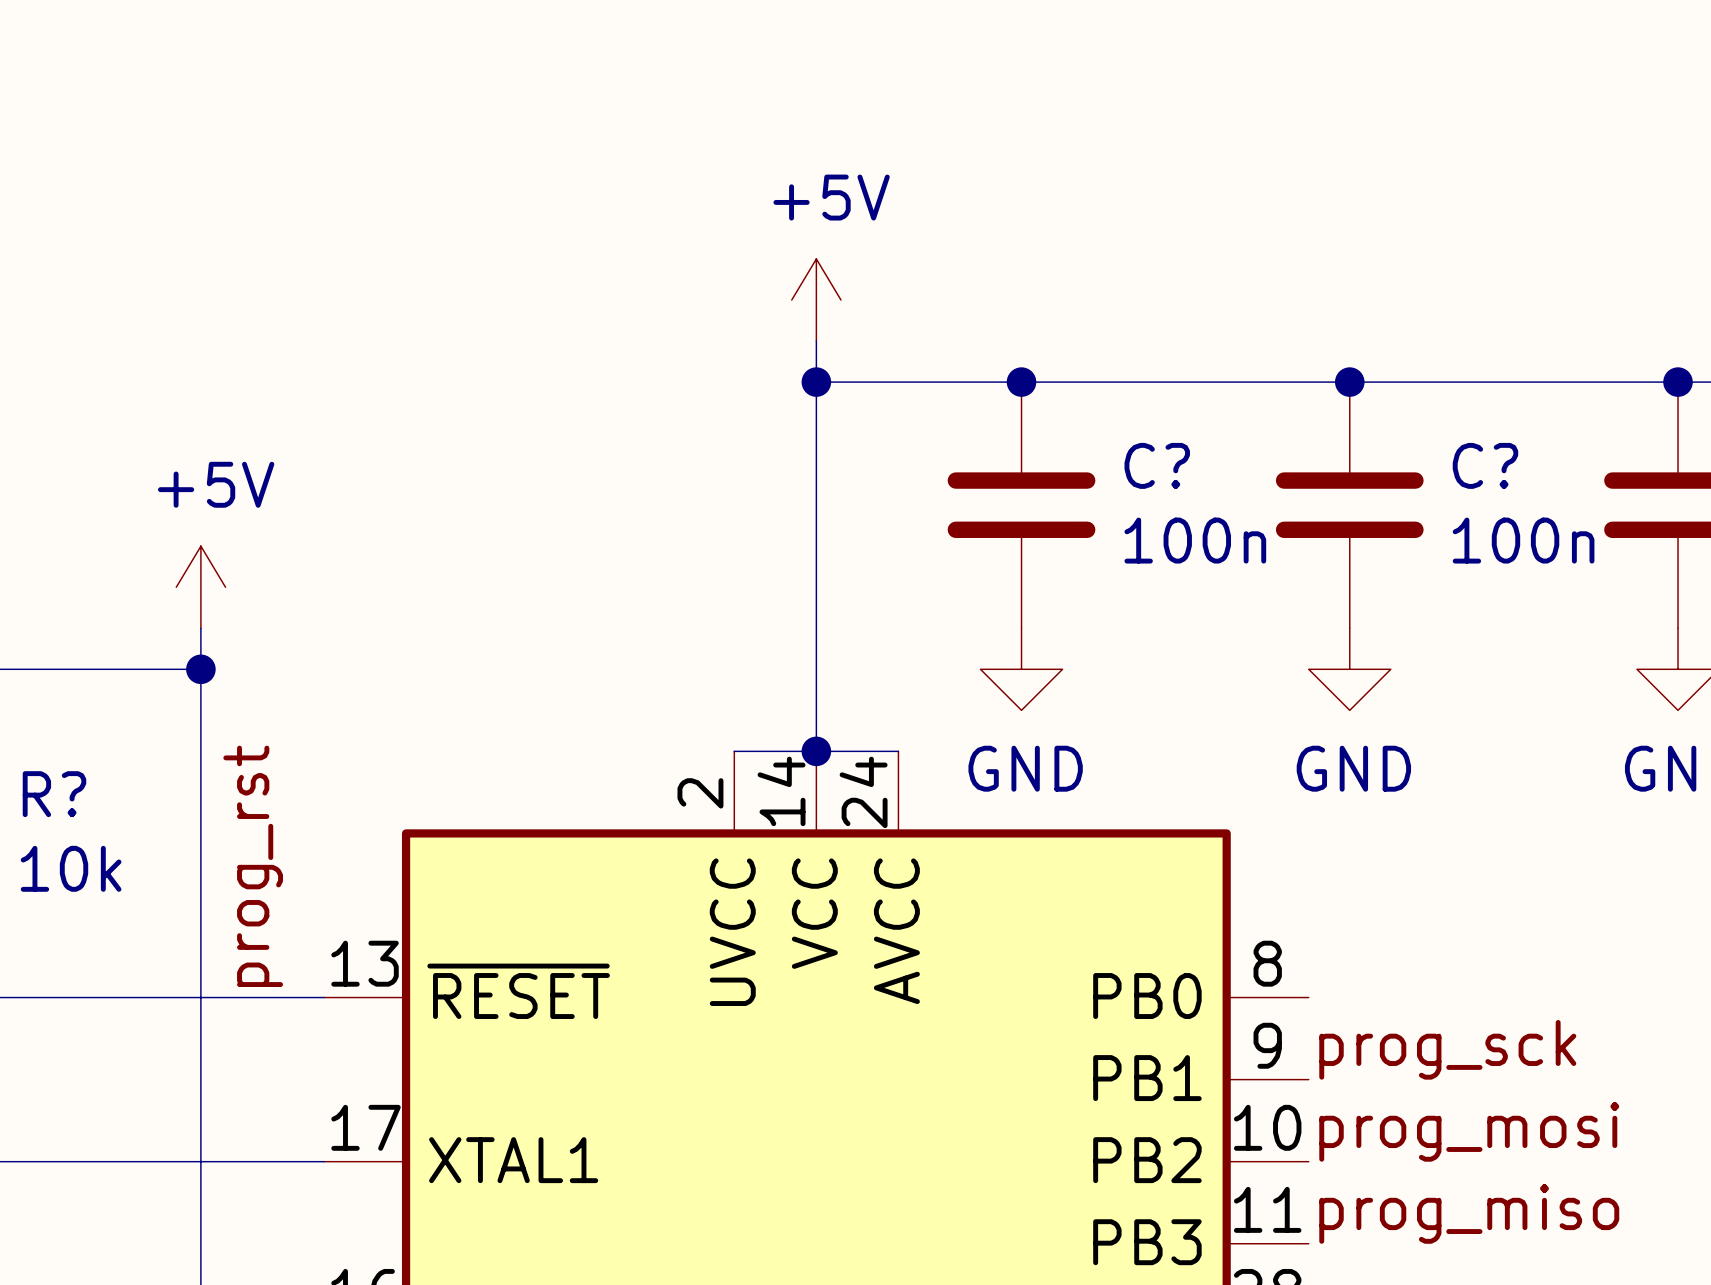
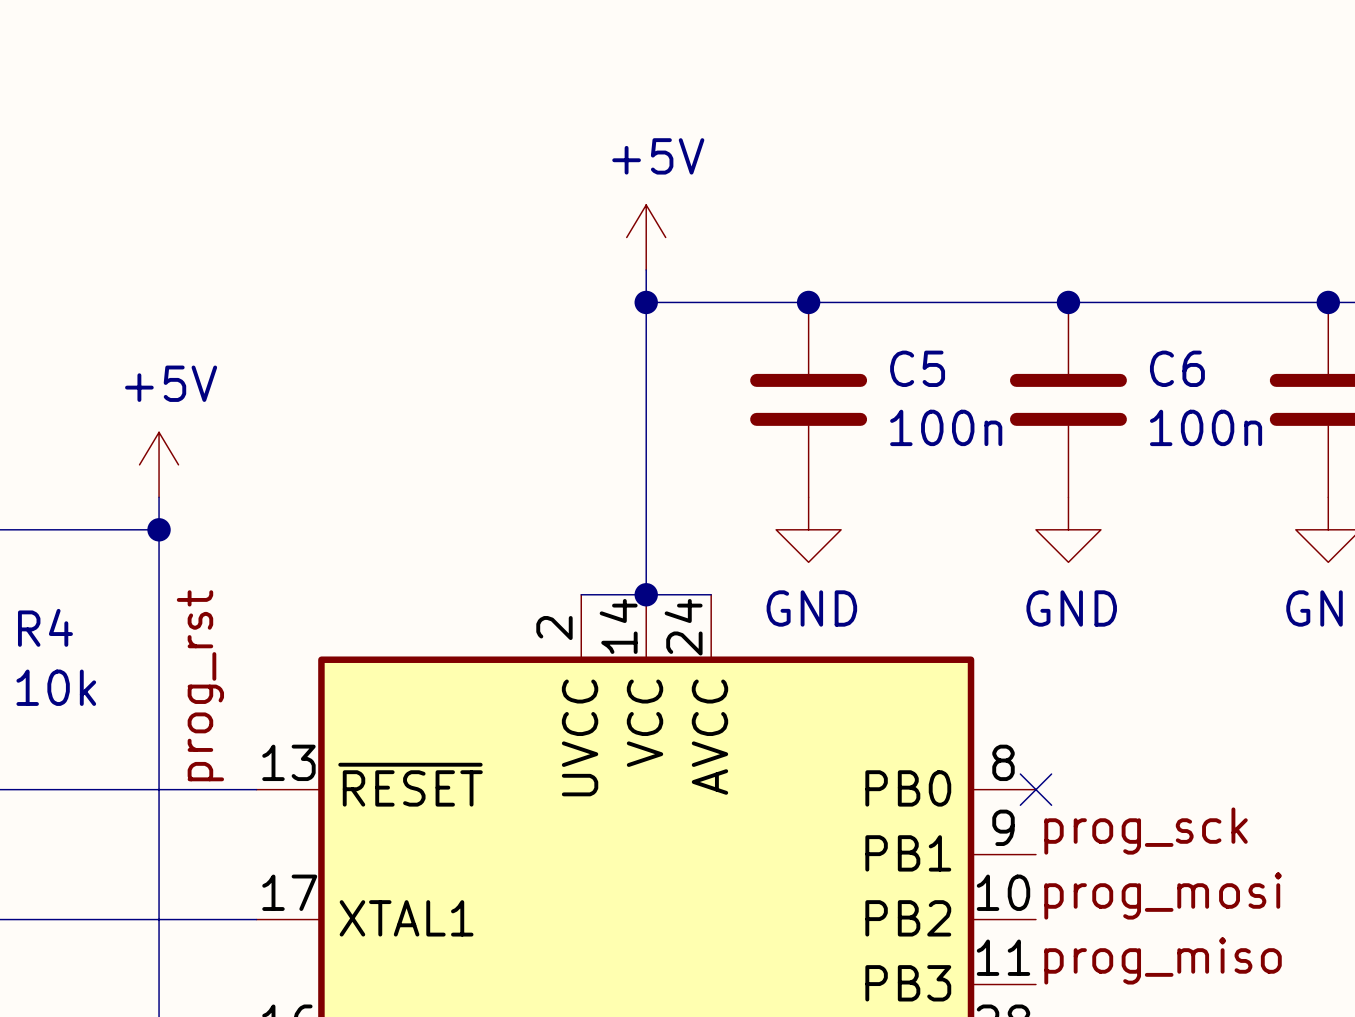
C? name: C? (1157, 465) -> C5 (917, 368)
C? name: C? (1485, 465) -> C6 (1177, 368)
R? name: R? (54, 794) -> R4 (45, 627)
no-connect mark: none -> (1035, 789)

